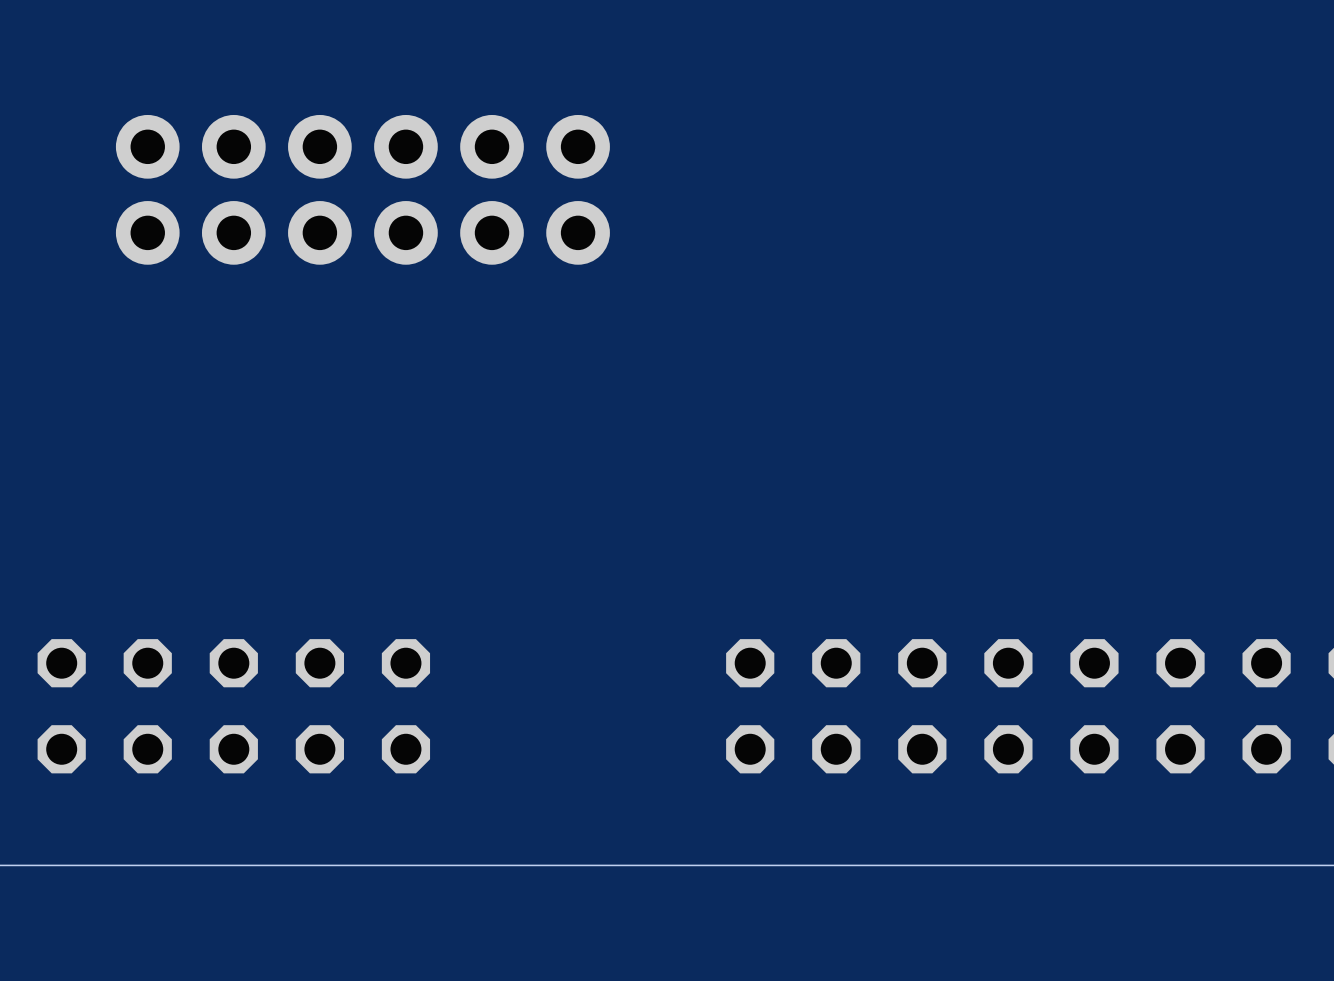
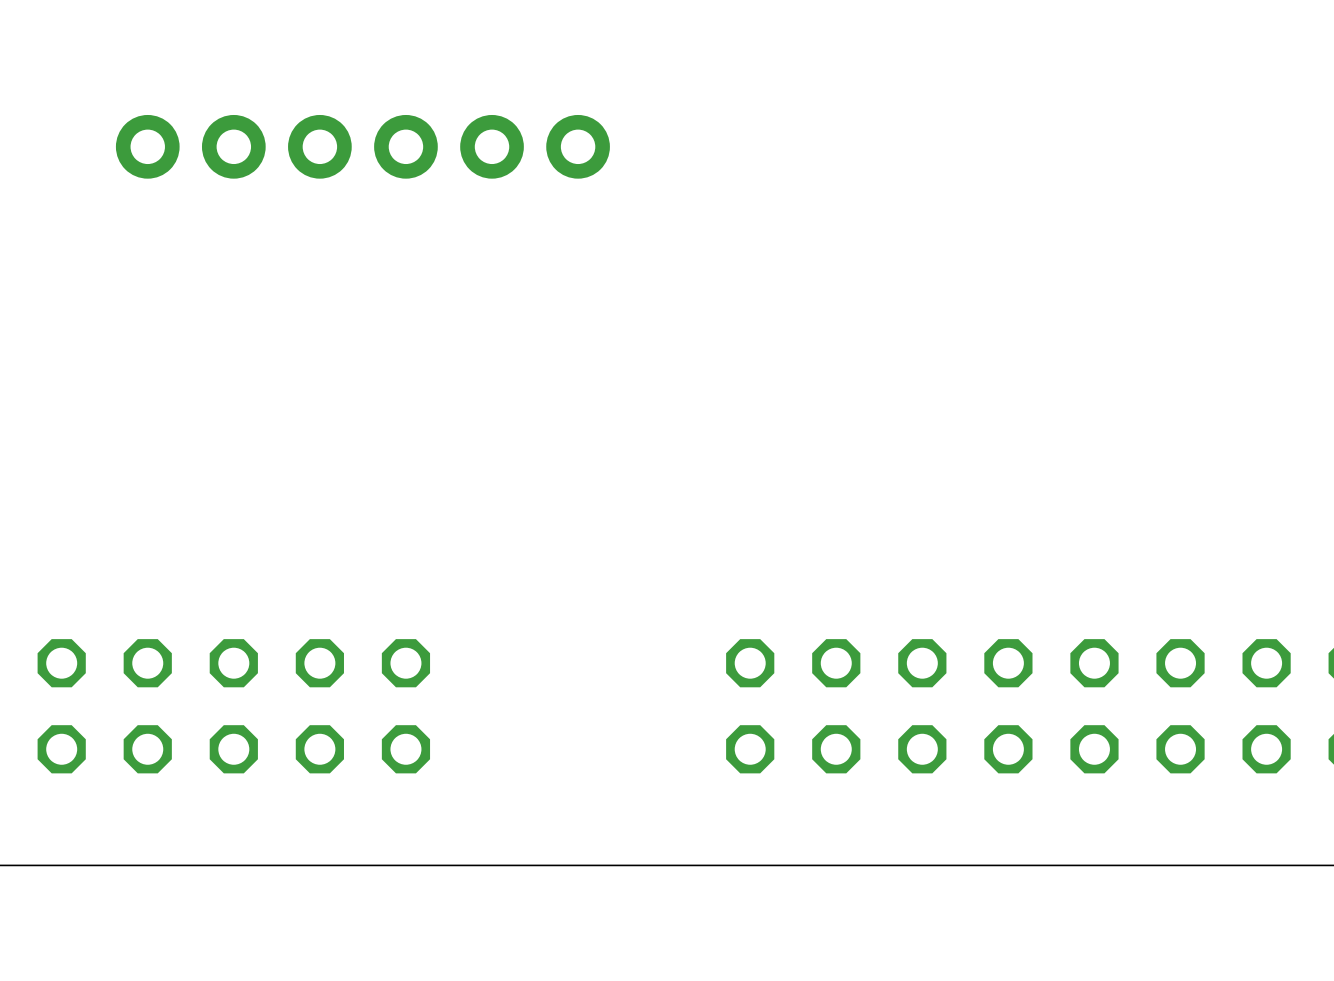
part: (362, 232) -> none

